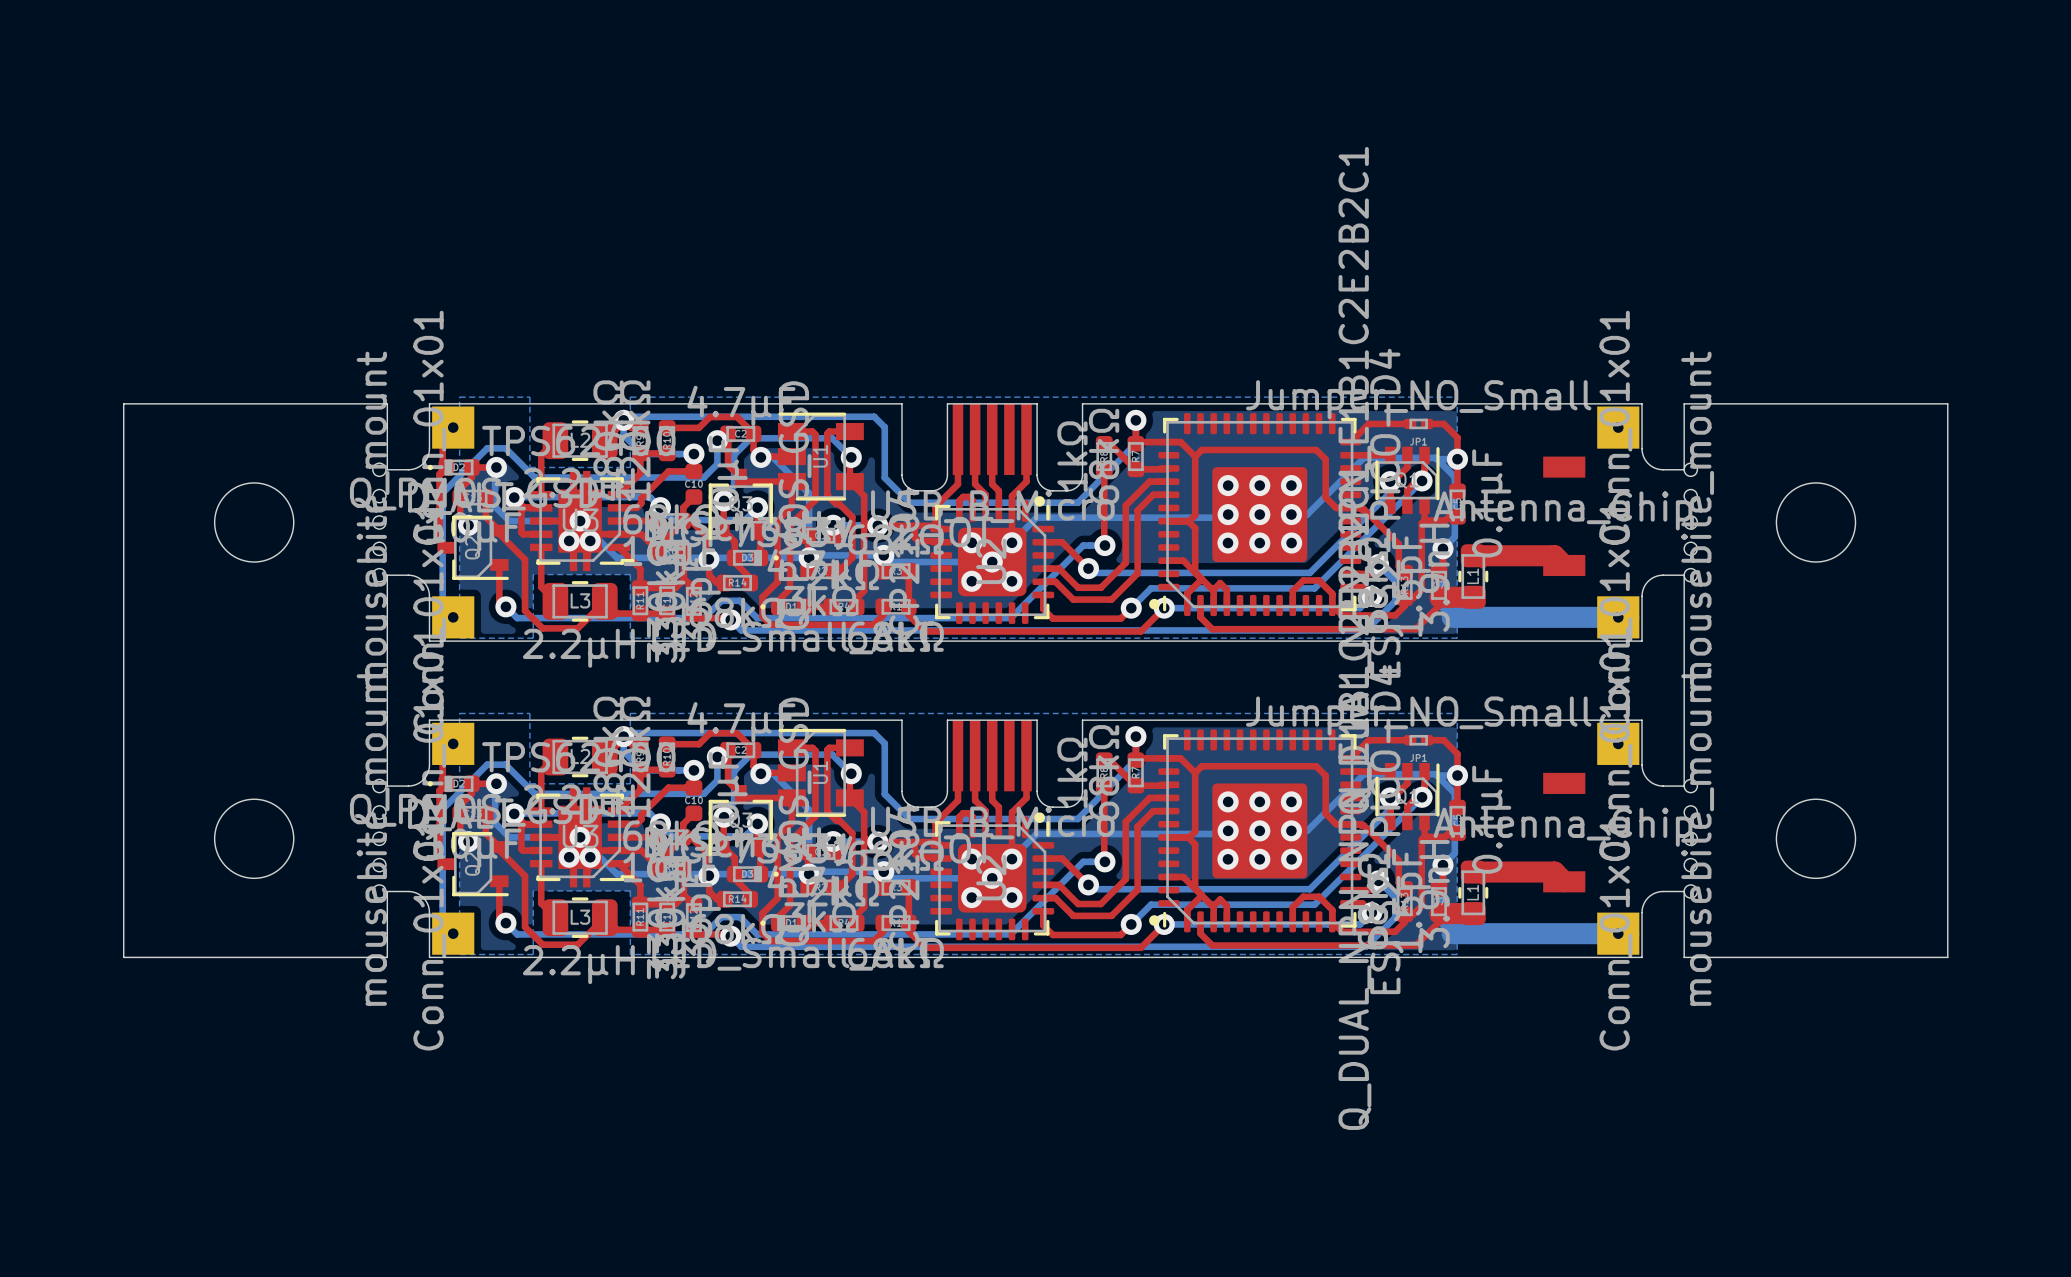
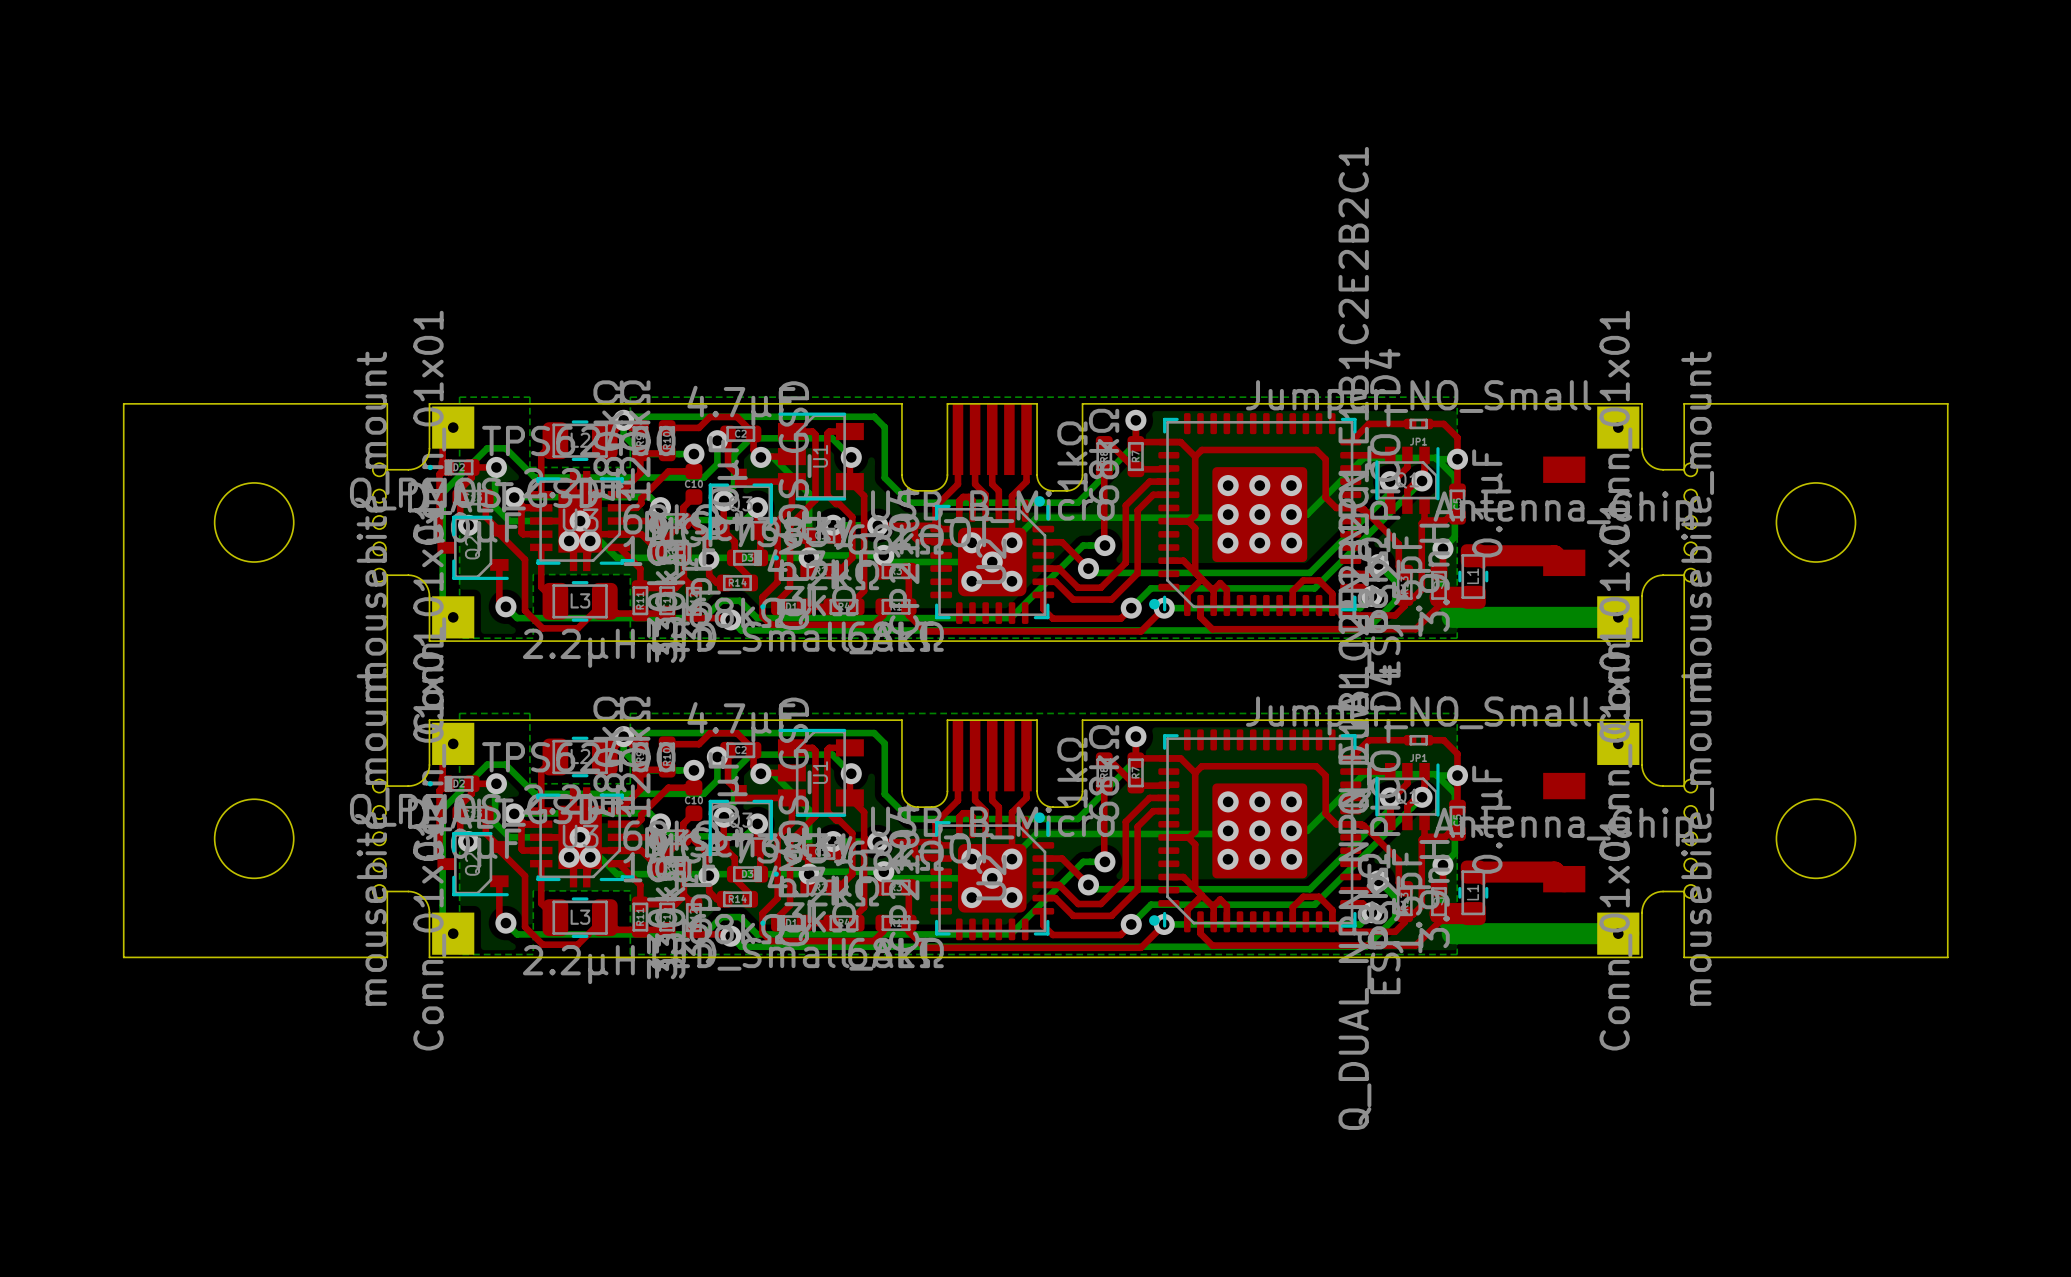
part footprint: [1543, 456, 1586, 577] -> [1543, 456, 1586, 577]
part footprint: [1543, 772, 1586, 893] -> [1543, 772, 1586, 893]

